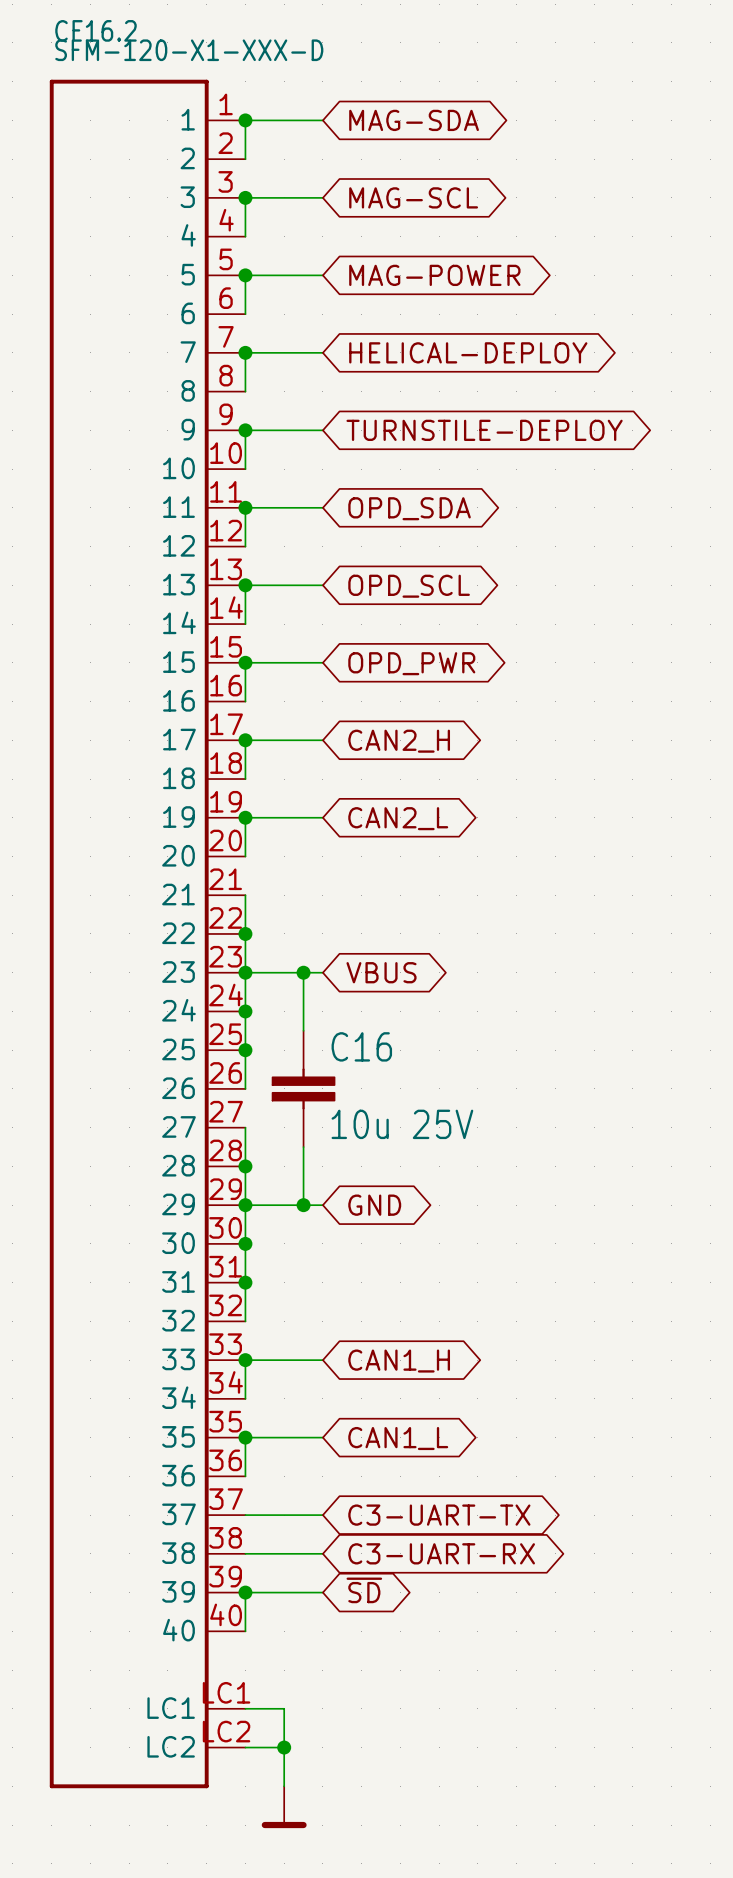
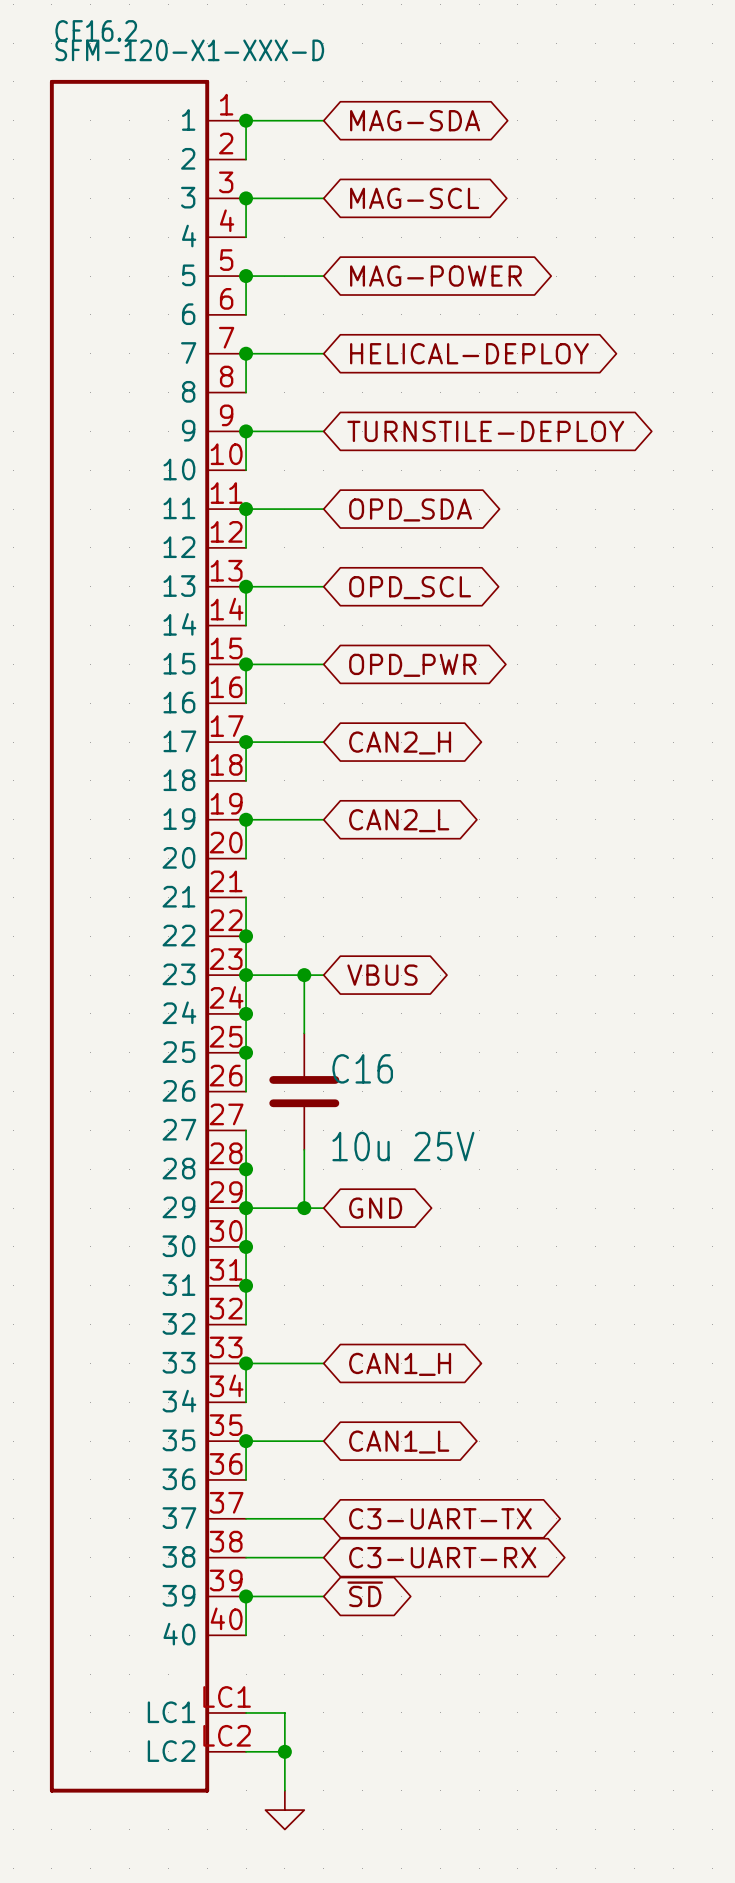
C16 symbol: [272, 1030, 335, 1148] -> [269, 1033, 340, 1150]
C16 name position: C16 (361, 1046) -> C16 (362, 1068)
C16 value position: 10u 25V (402, 1124) -> 10u 25V (403, 1146)
power symbol shape: [261, 1786, 307, 1829] -> [265, 1790, 305, 1830]

